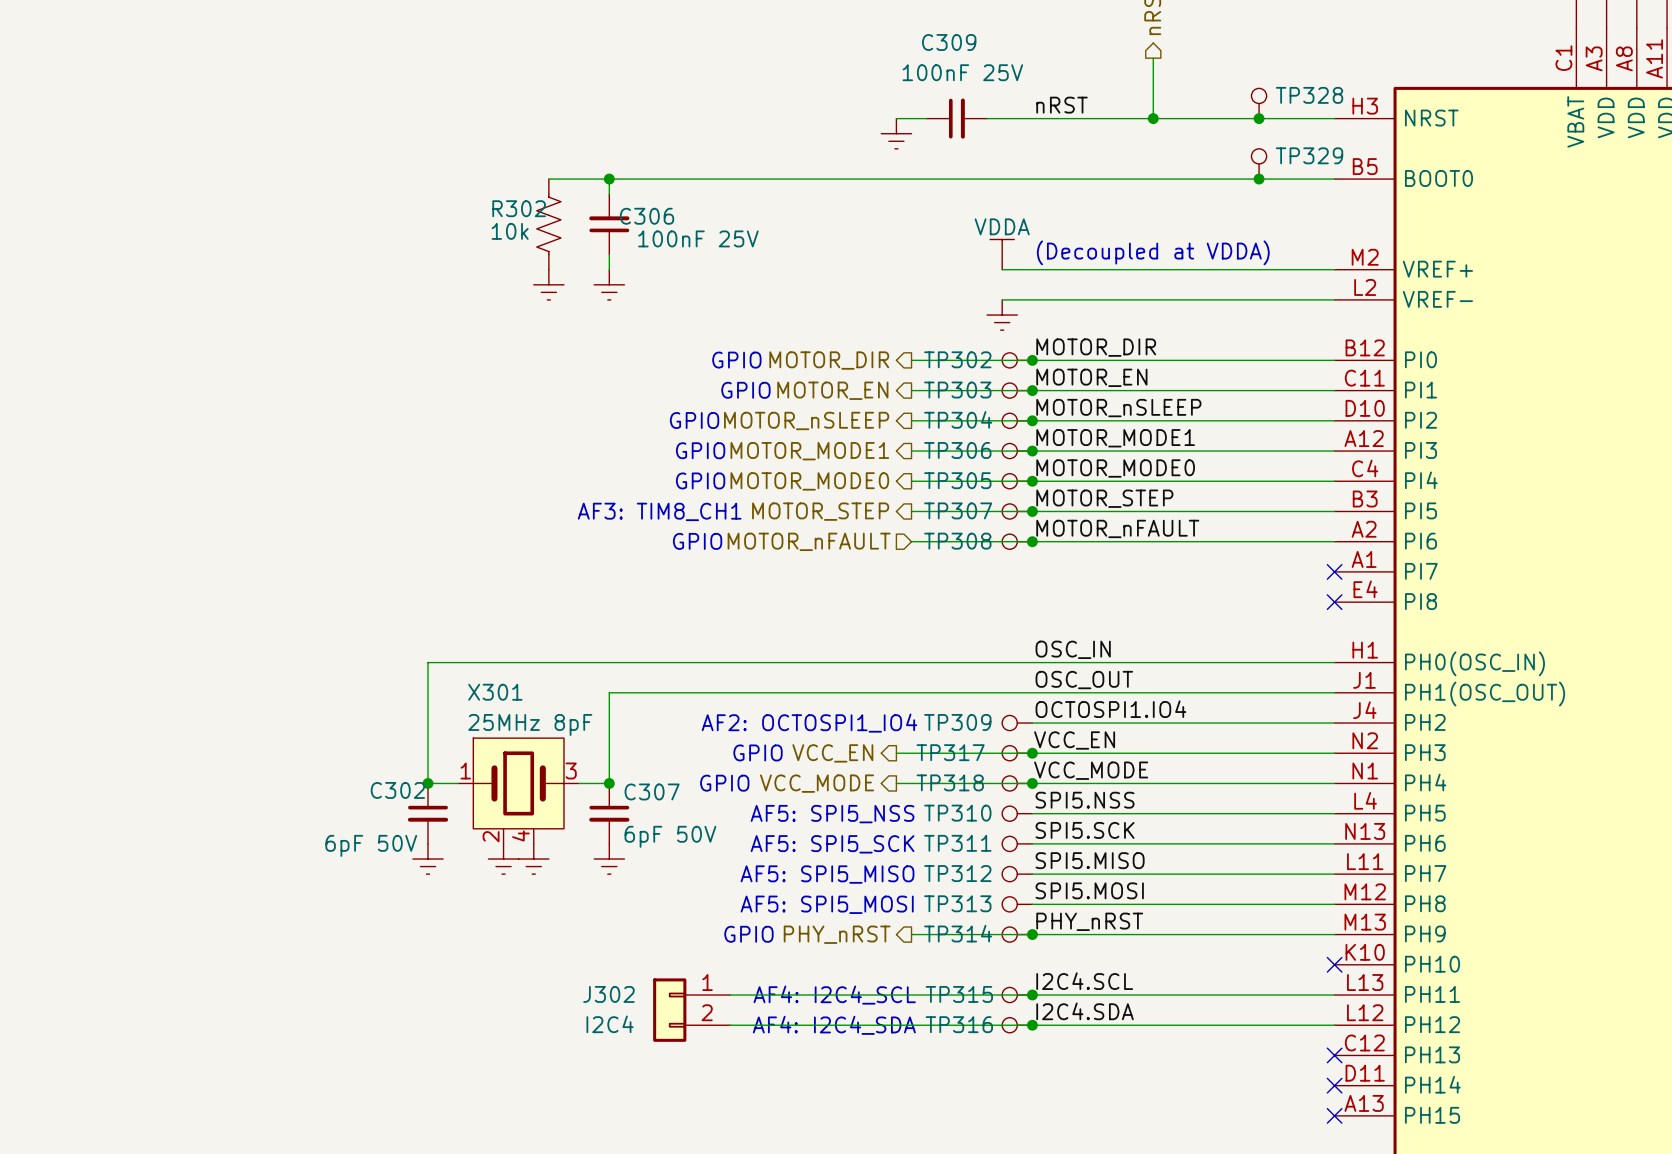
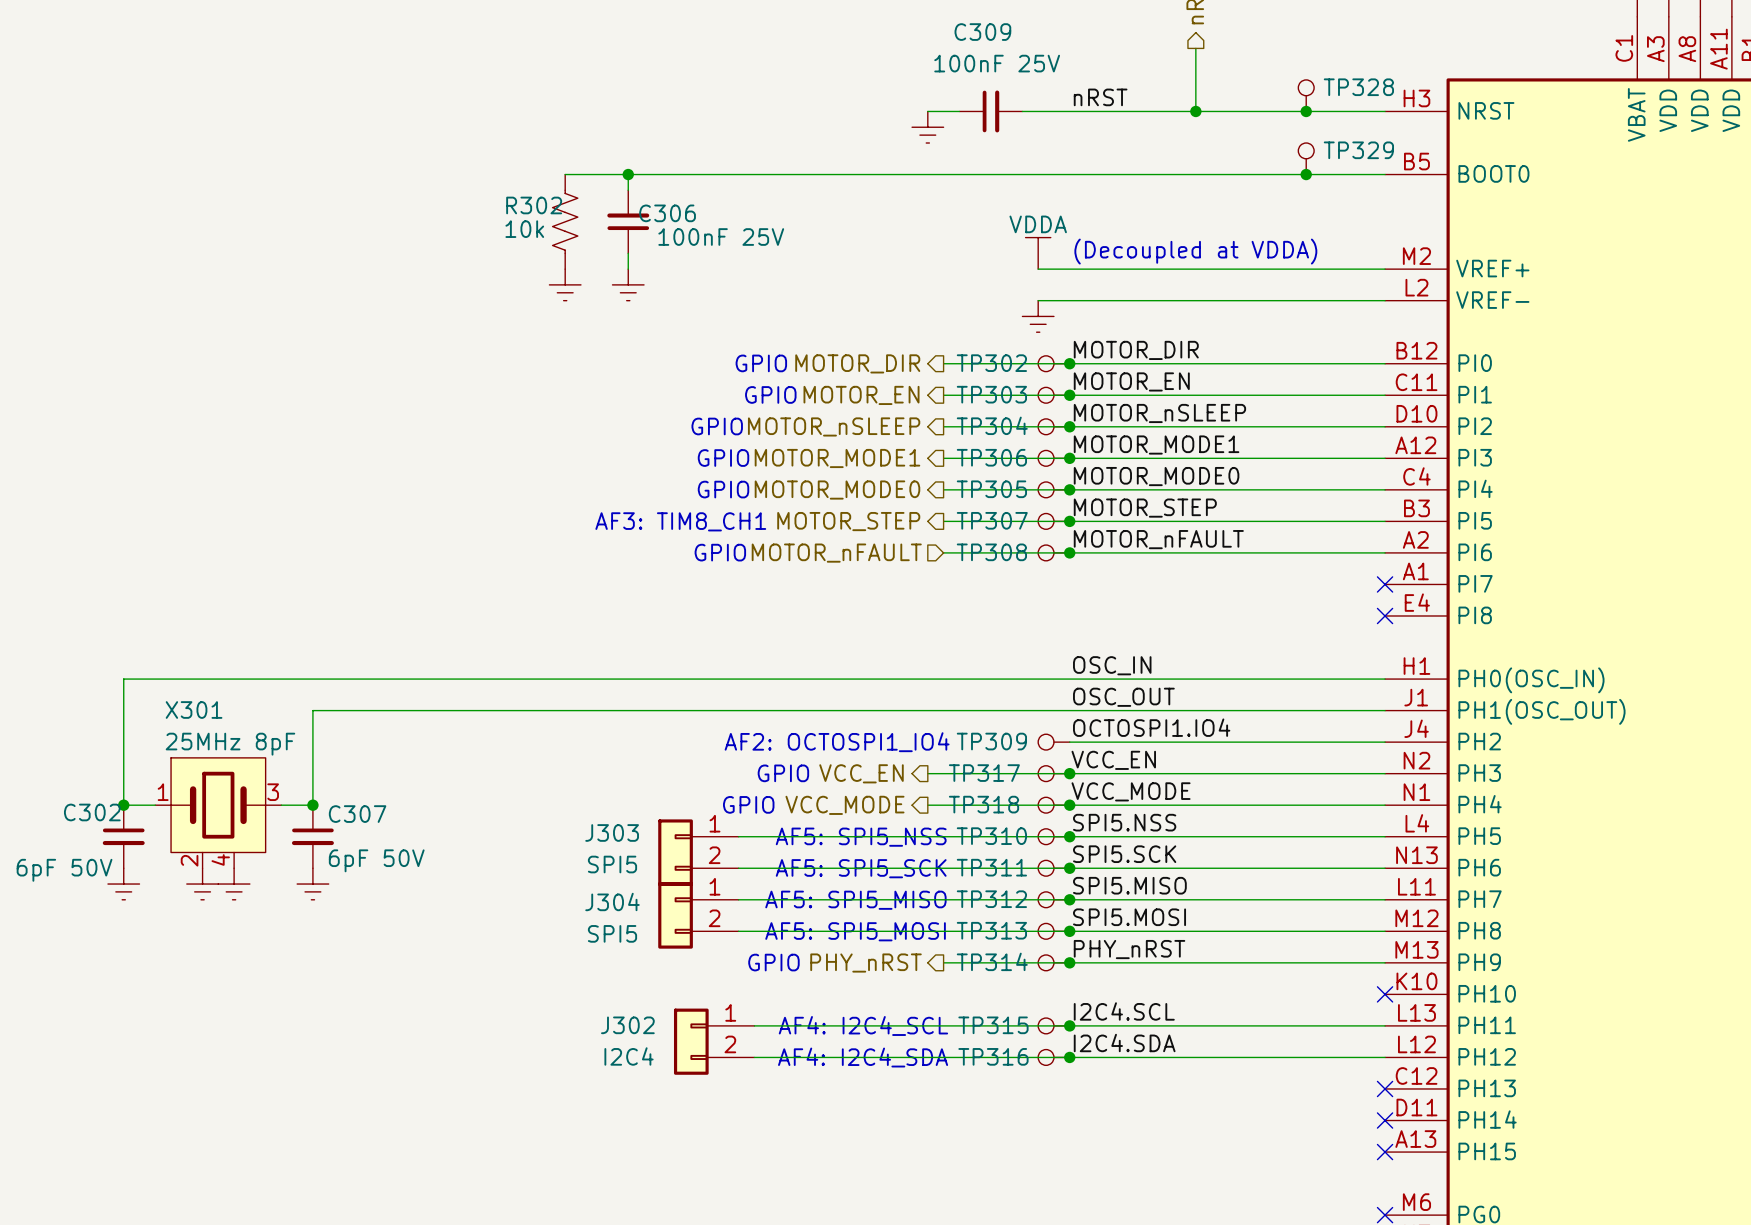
wire: (427, 662) (427, 783) (458, 783) -> (439, 679) (123, 679) (123, 805) (155, 805)
wire: (609, 692) (609, 783) (579, 783) -> (628, 710) (312, 710) (312, 805) (281, 805)
junction: none -> (123, 805)
junction: none -> (312, 805)
junction: (427, 783) -> none
junction: (609, 783) -> none
X301 position: (518, 791) -> (218, 813)
C302 position: (427, 813) -> (123, 836)
C307 position: (609, 813) -> (312, 836)
wire: none -> (738, 836) (1069, 836)
junction: none -> (1069, 836)
J303: none -> SPI5 (698, 852)
wire: none -> (738, 868) (1069, 868)
junction: none -> (1069, 868)
power symbol: none -> (123, 884)
power symbol: none -> (202, 884)
power symbol: none -> (234, 884)
power symbol: none -> (312, 884)
power symbol: (427, 859) -> none
power symbol: (503, 859) -> none
power symbol: (533, 859) -> none
power symbol: (609, 859) -> none
wire: none -> (738, 899) (1069, 899)
junction: none -> (1069, 899)
J304: none -> SPI5 (698, 915)
wire: none -> (738, 931) (1069, 931)
junction: none -> (1069, 931)

